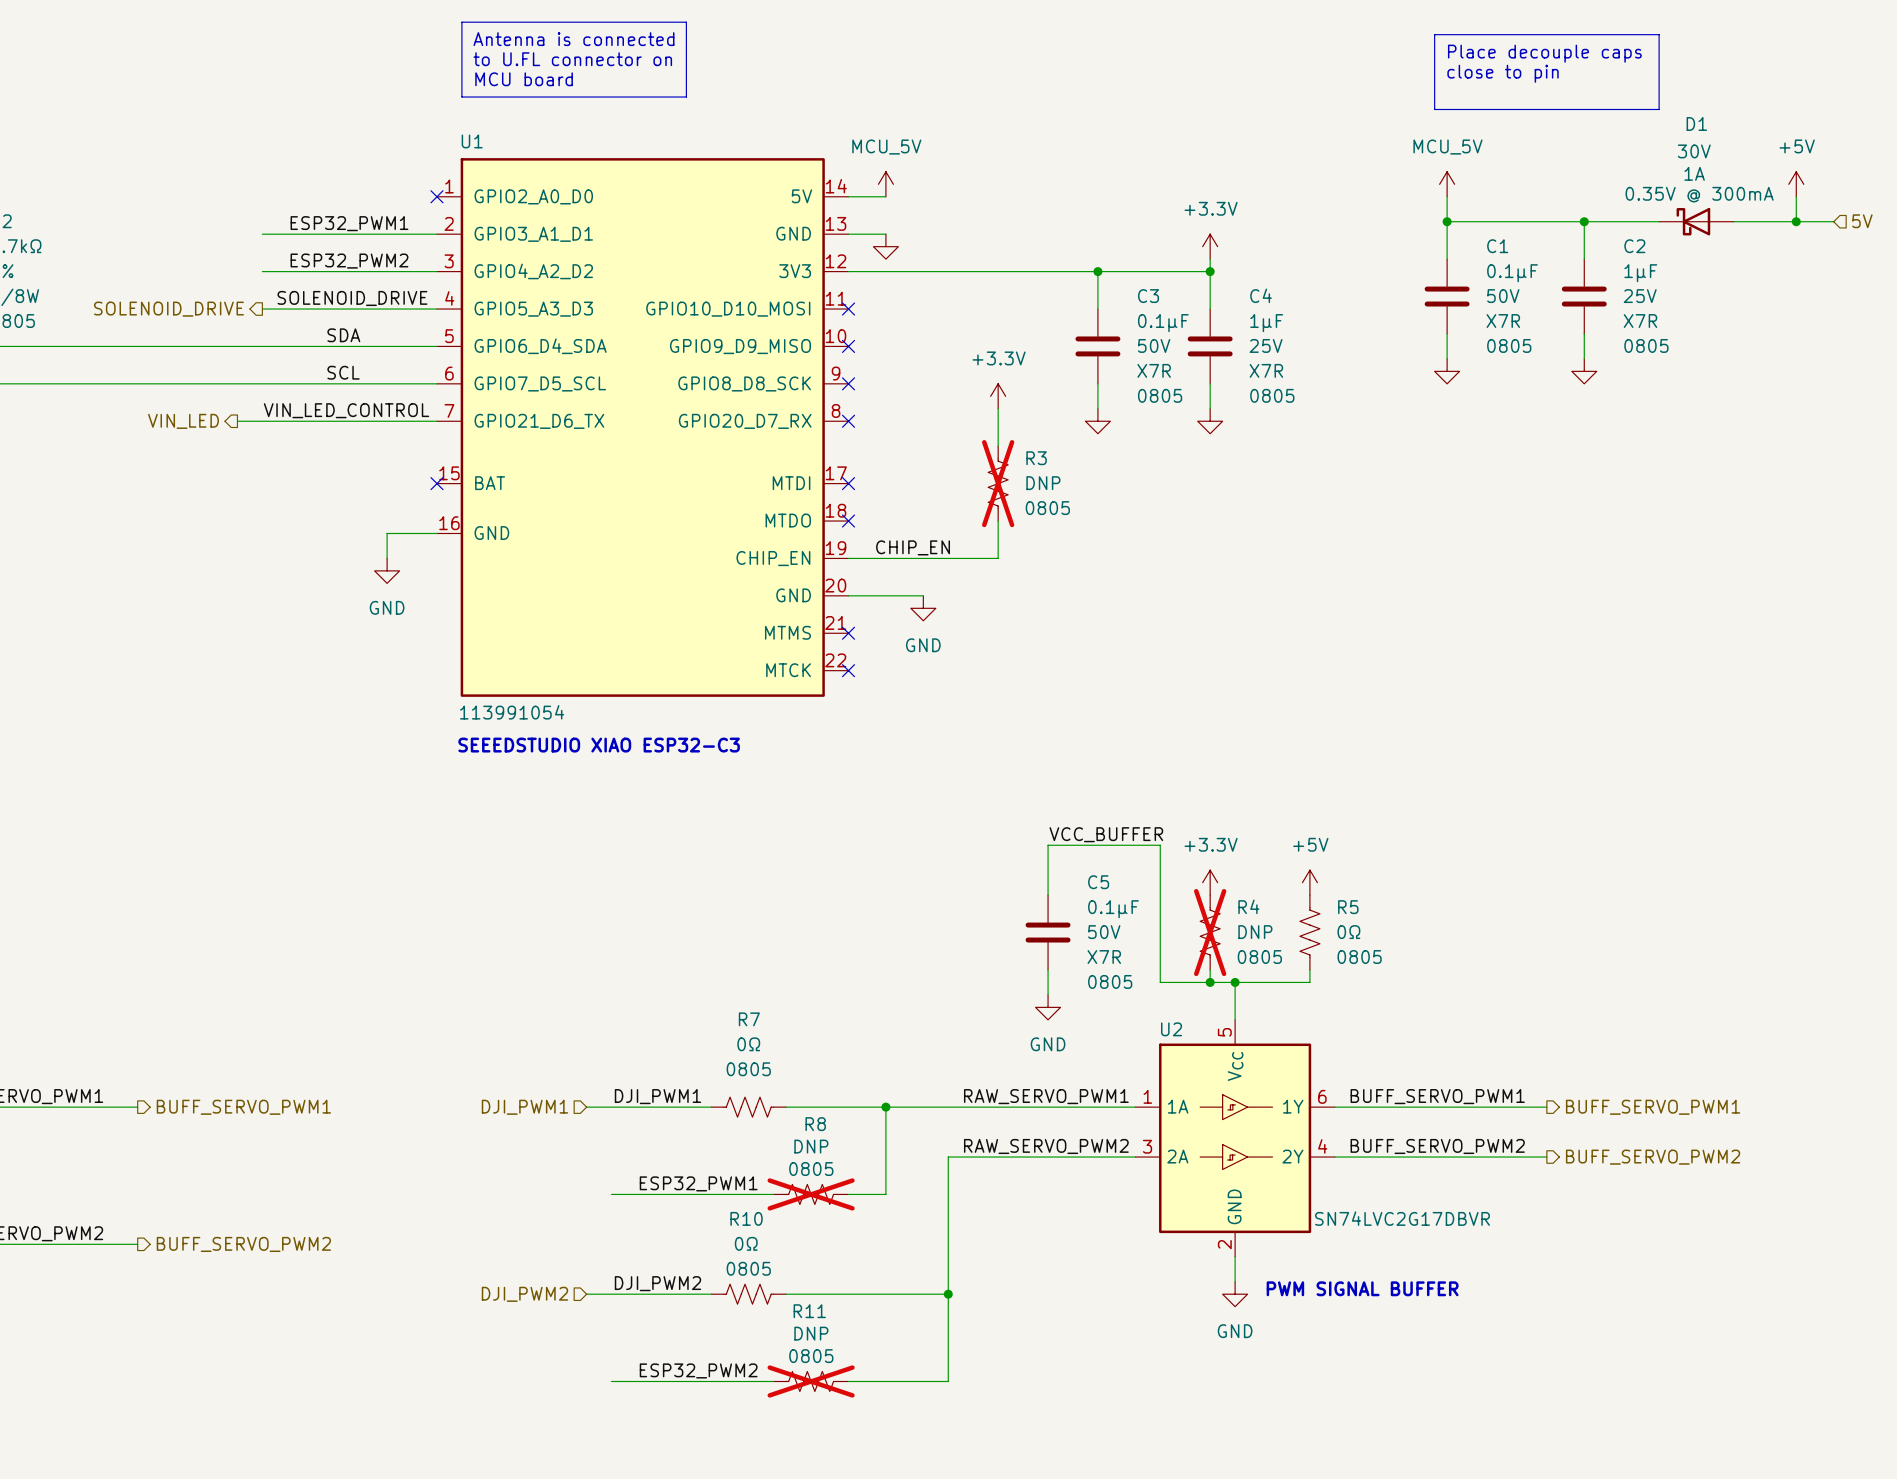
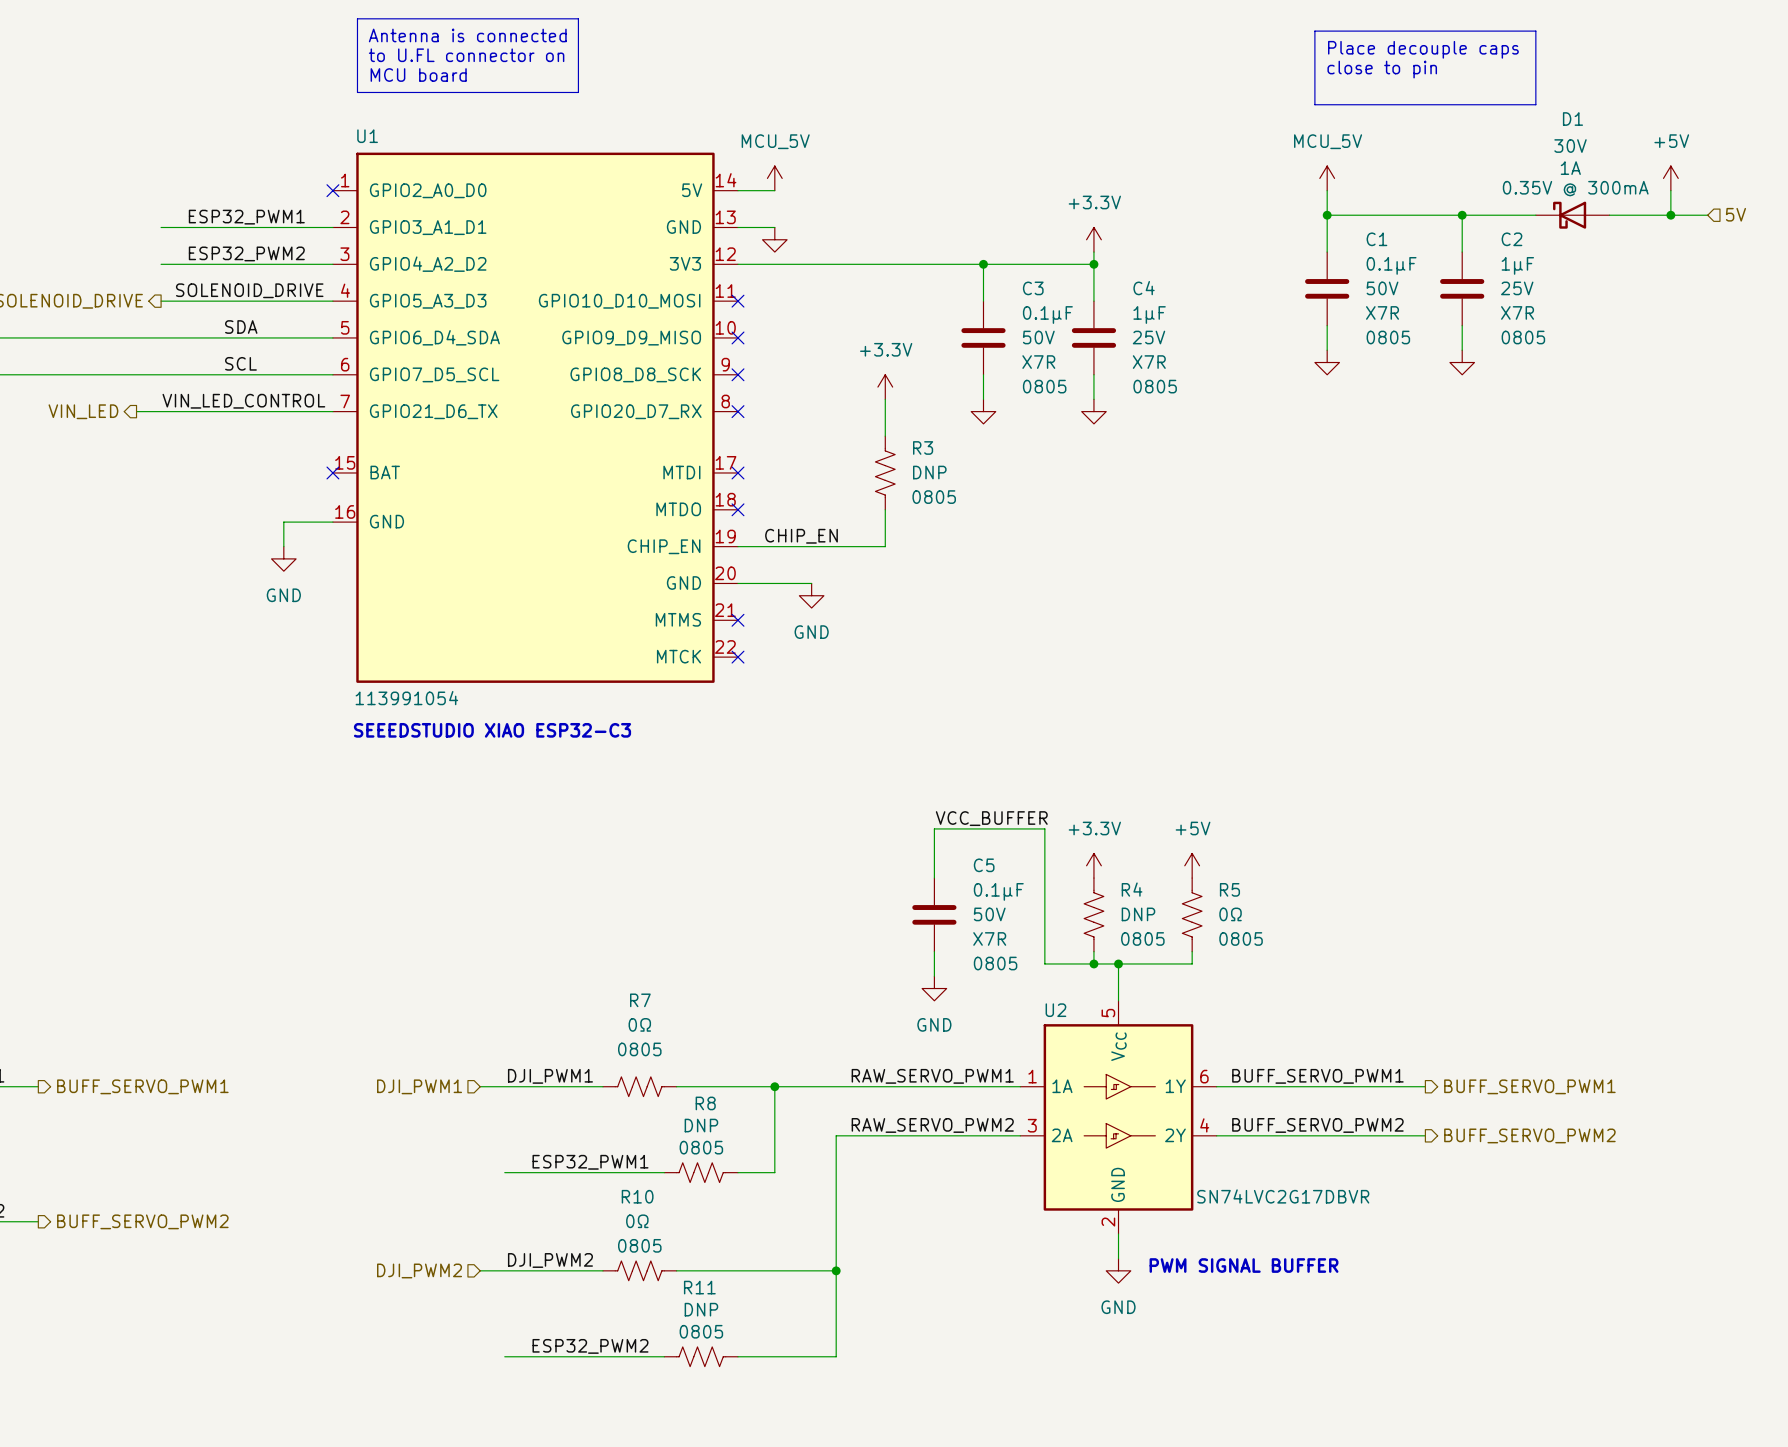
R3 do-not-place cross: (998, 483) -> none
R4 do-not-place cross: (1210, 932) -> none
R8 do-not-place cross: (811, 1194) -> none
R11 do-not-place cross: (811, 1381) -> none

